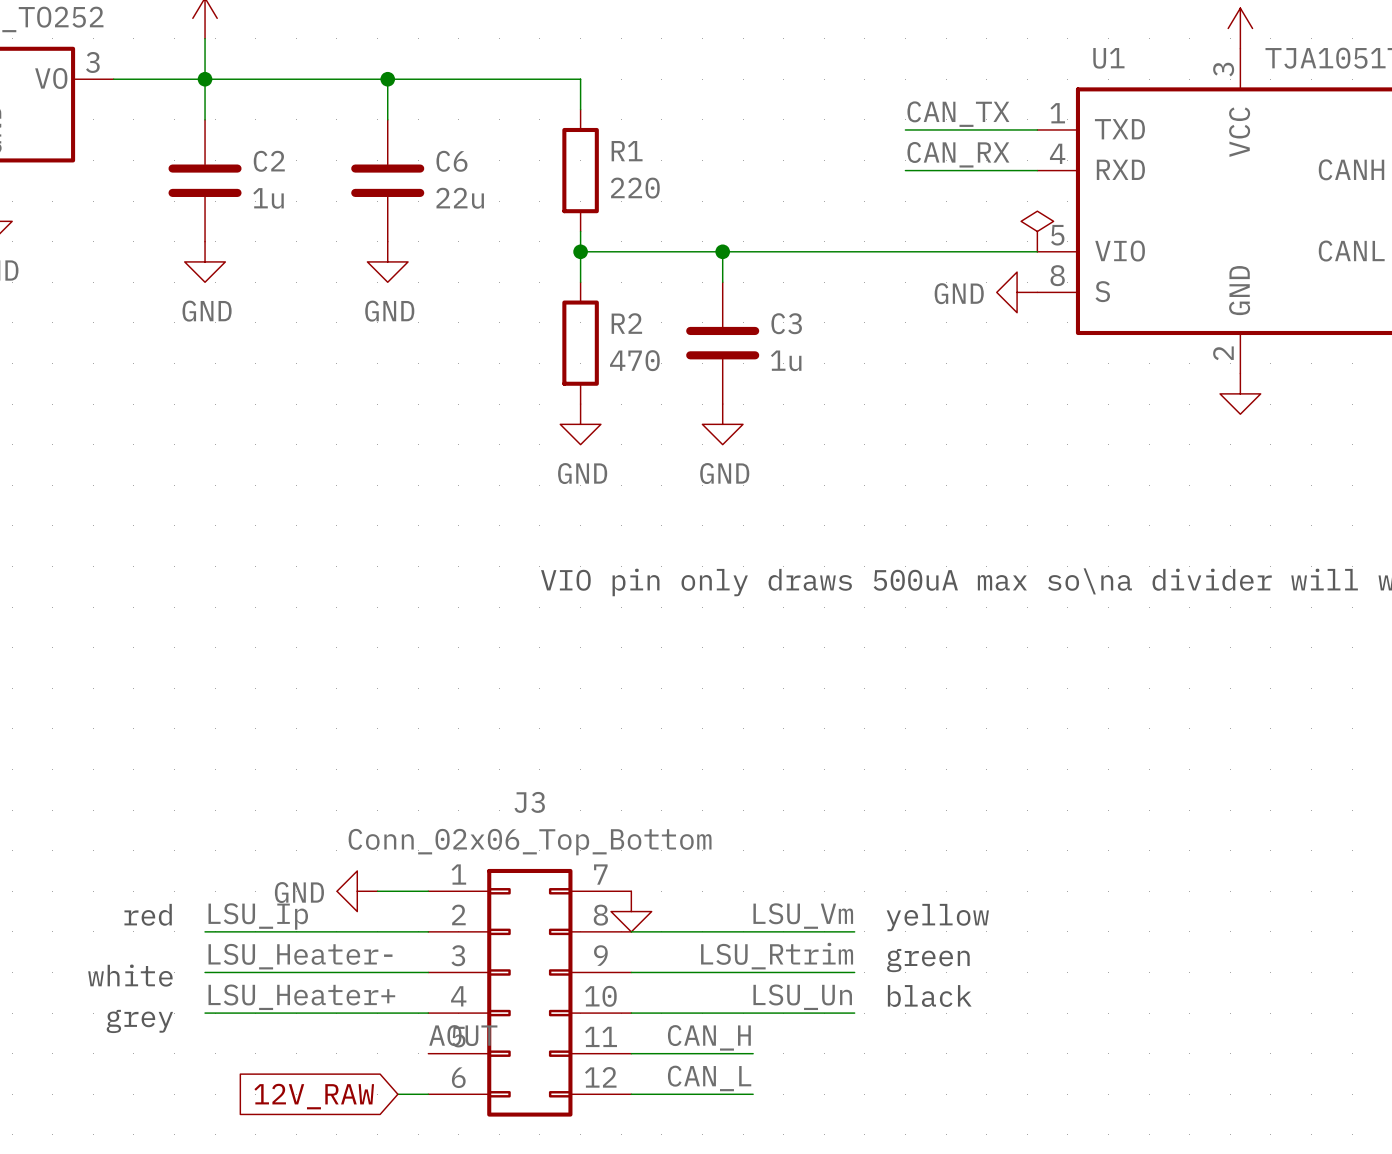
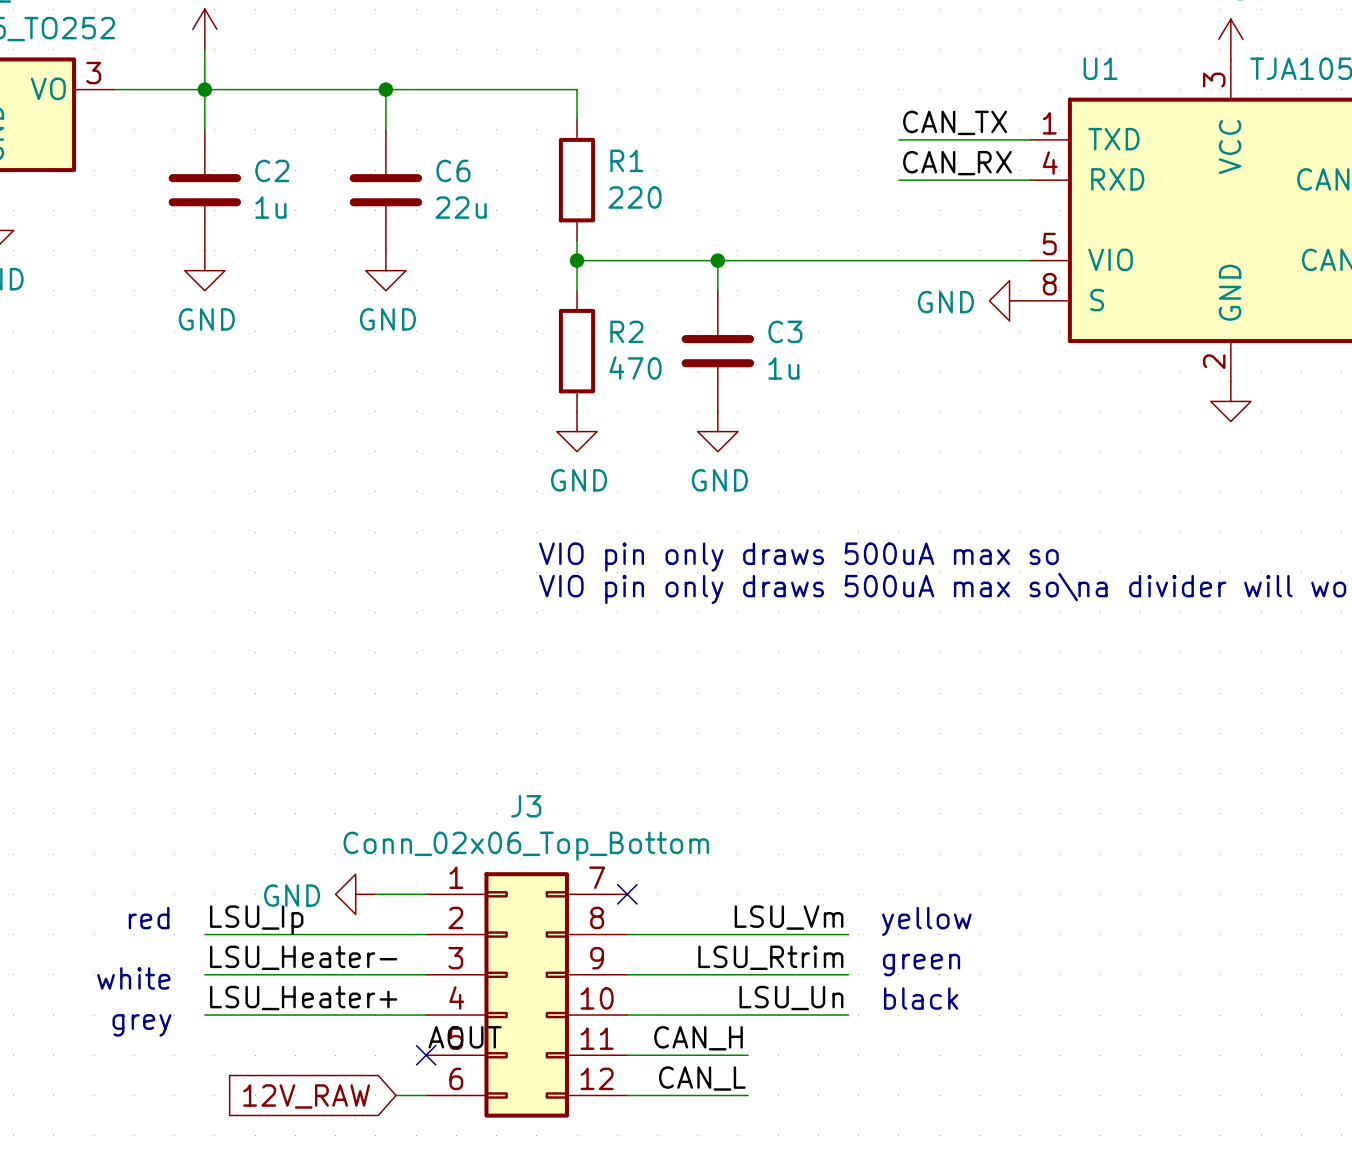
power symbol: (1037, 231) -> none
text: none -> VIO pin only draws 500uA max so (798, 557)
no-connect mark: none -> (627, 894)
power symbol: (631, 911) -> none
no-connect mark: none -> (426, 1055)

